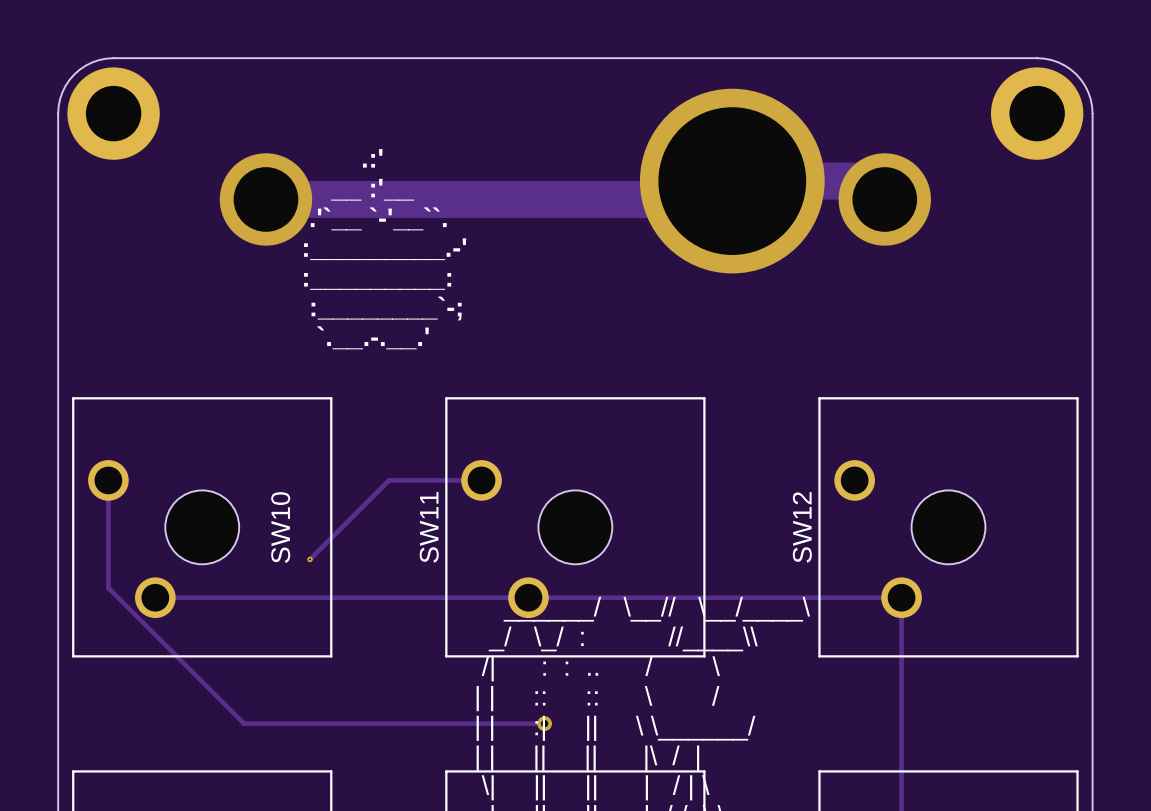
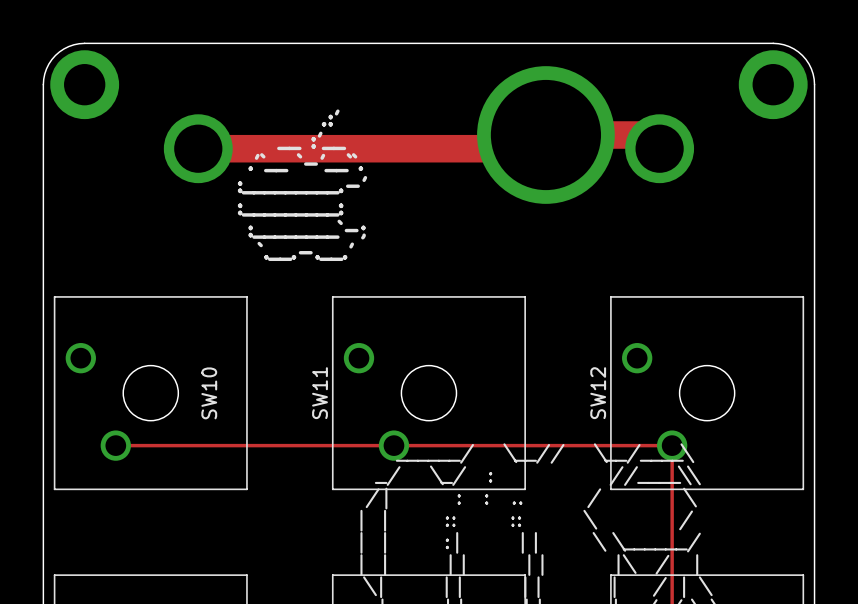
track: (108, 480) (108, 588) (244, 723) (544, 723) -> none
track: (481, 480) (389, 480) (310, 559) -> none
via: (310, 559) -> none
via: (544, 723) -> none

